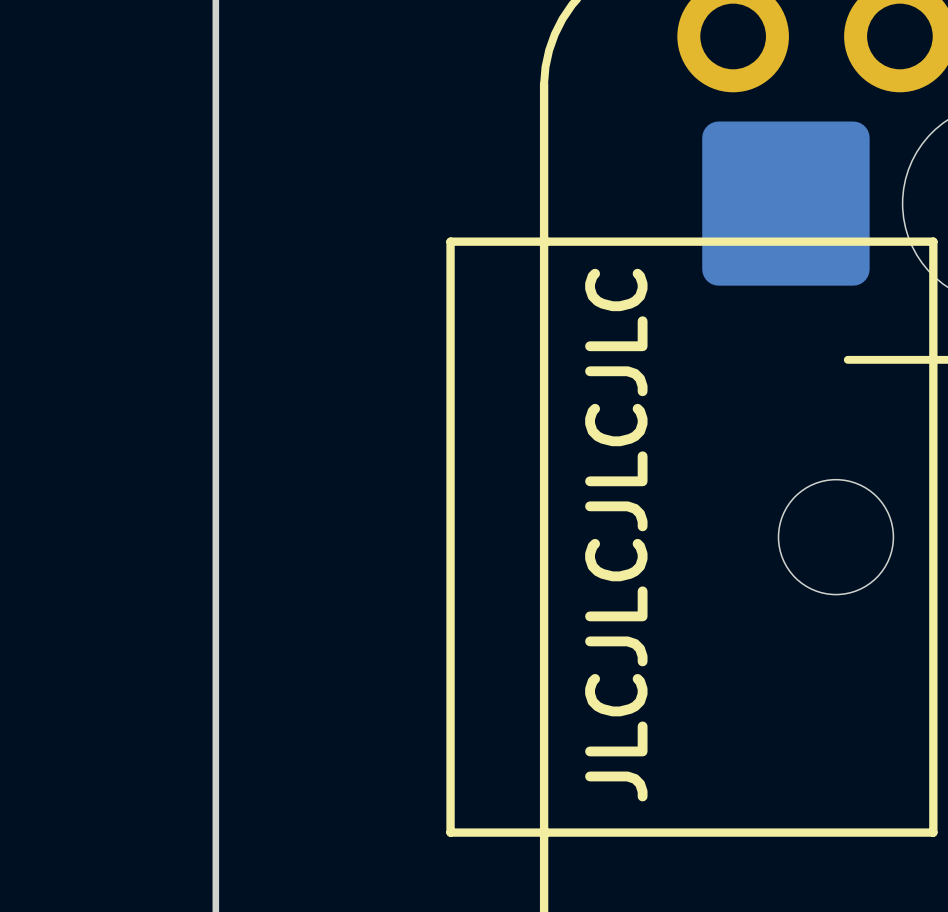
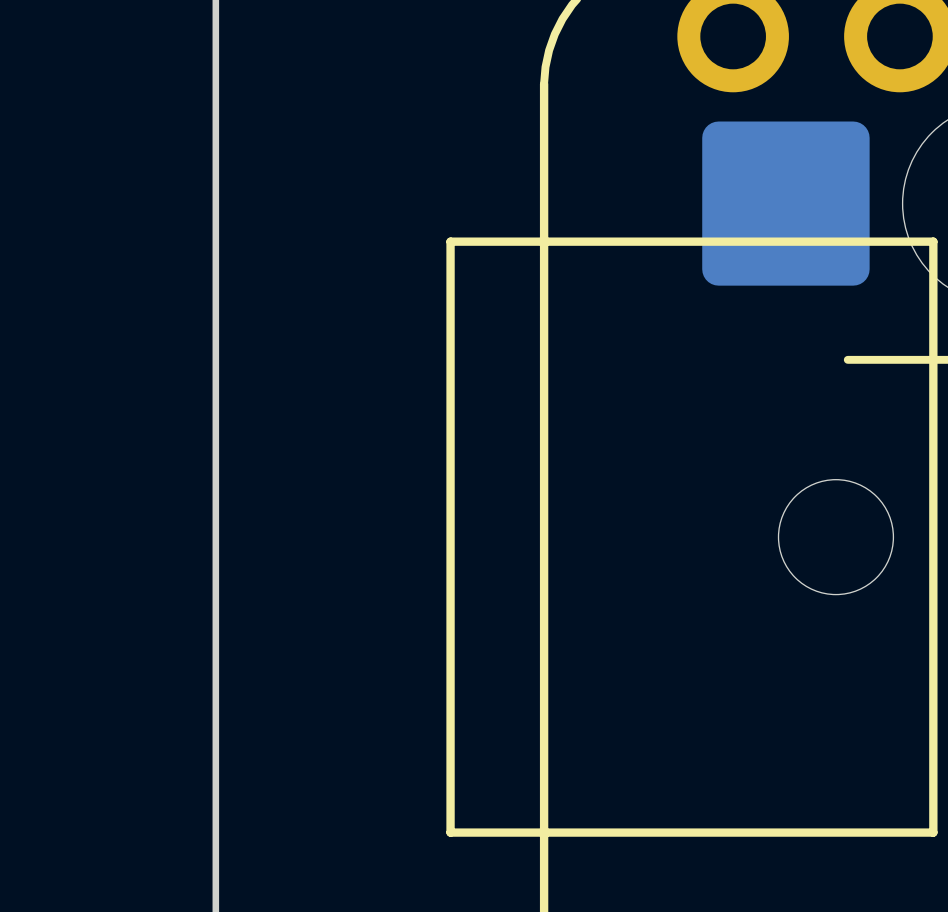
text: JLCJLCJLCJLC (616, 535) -> none

